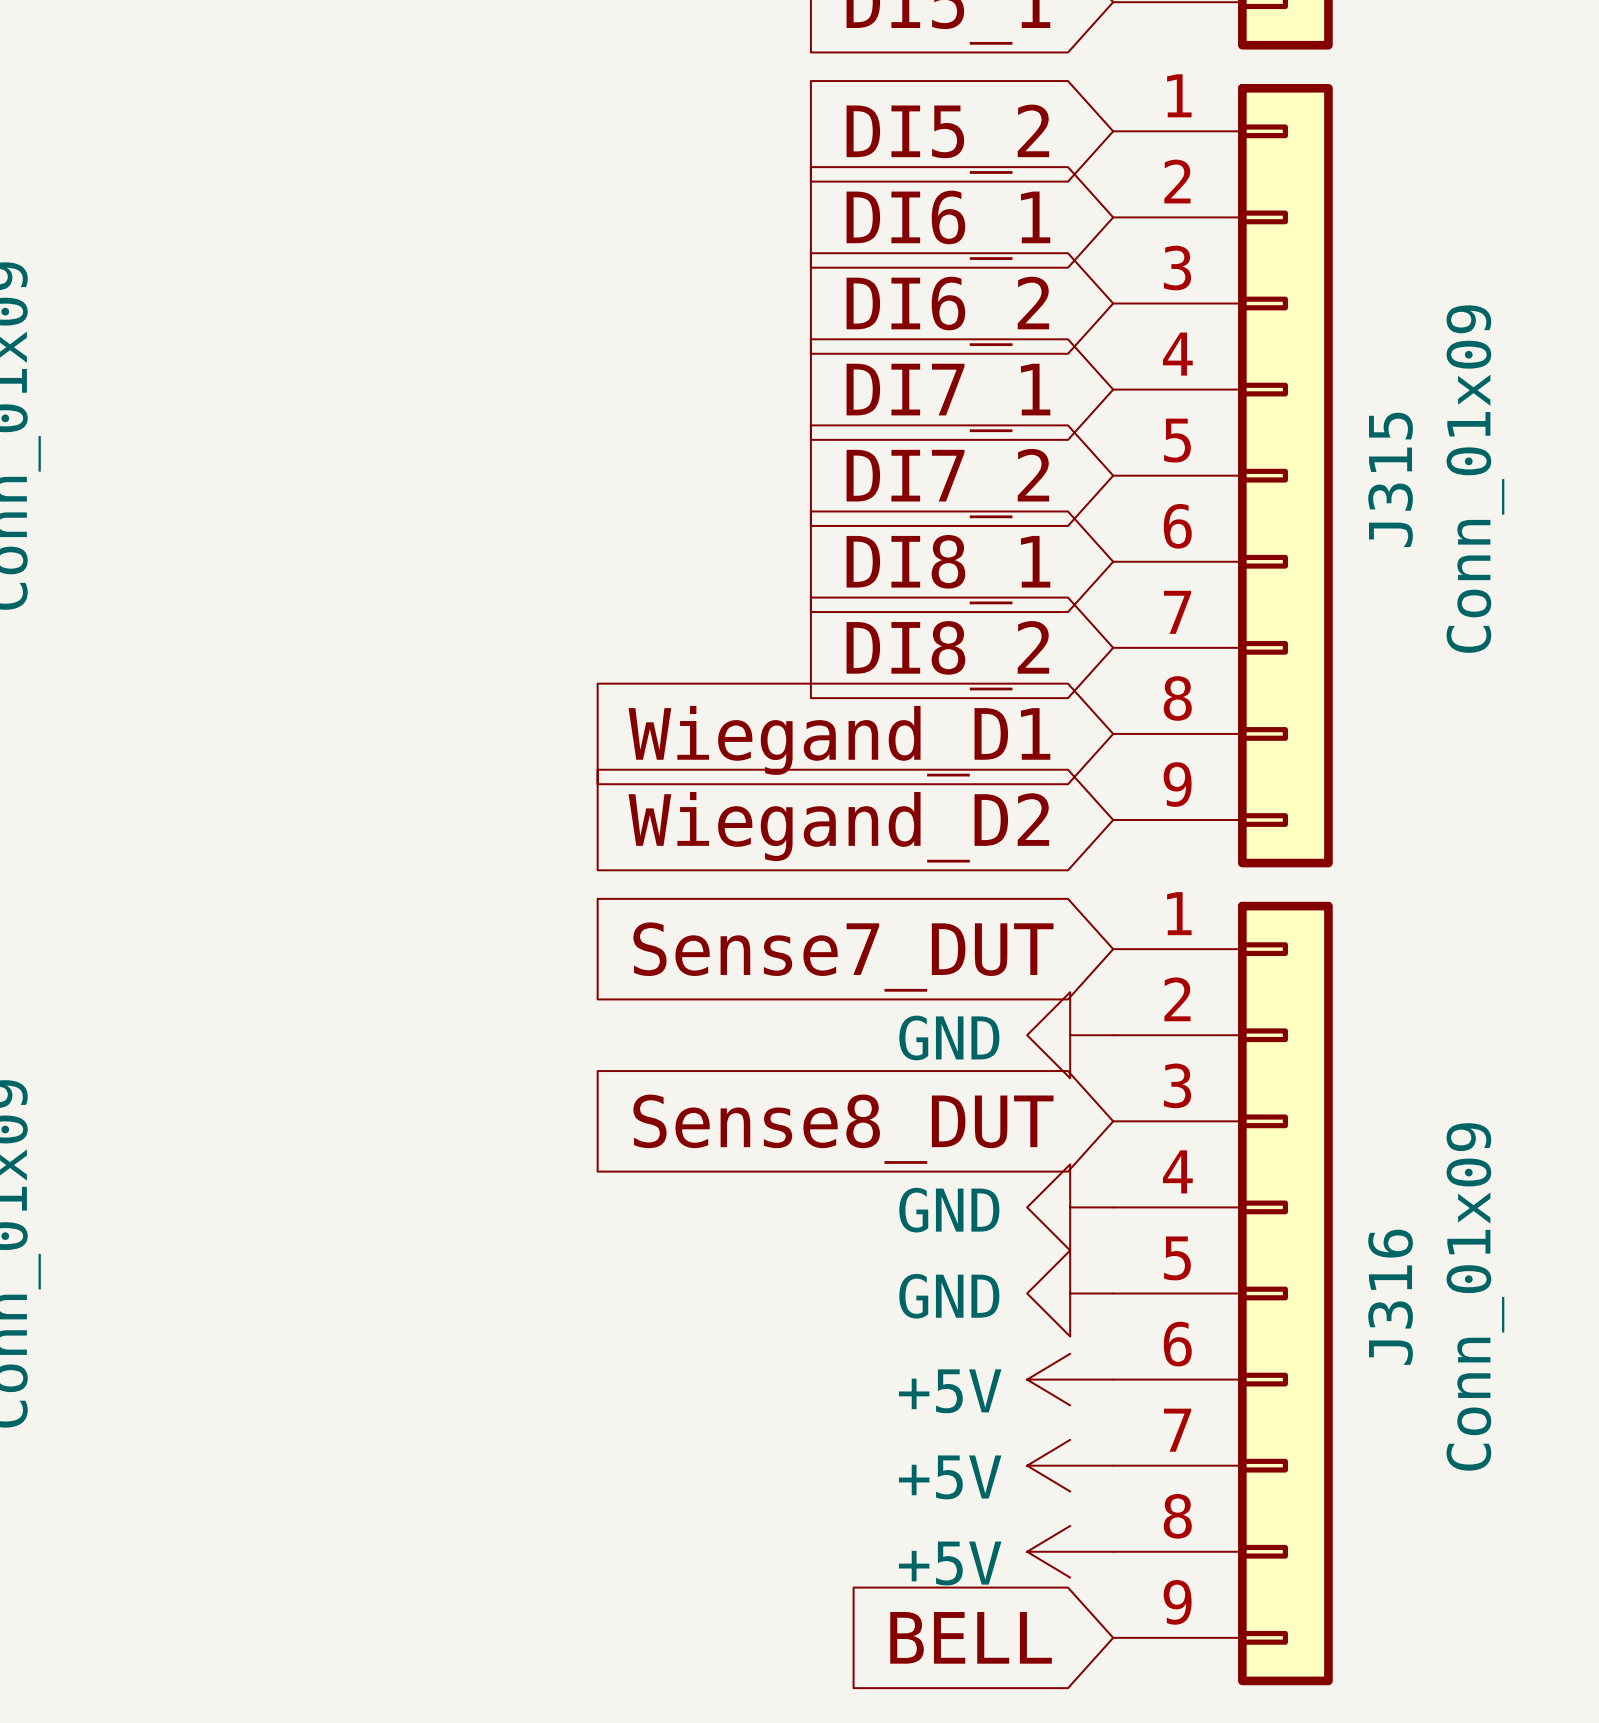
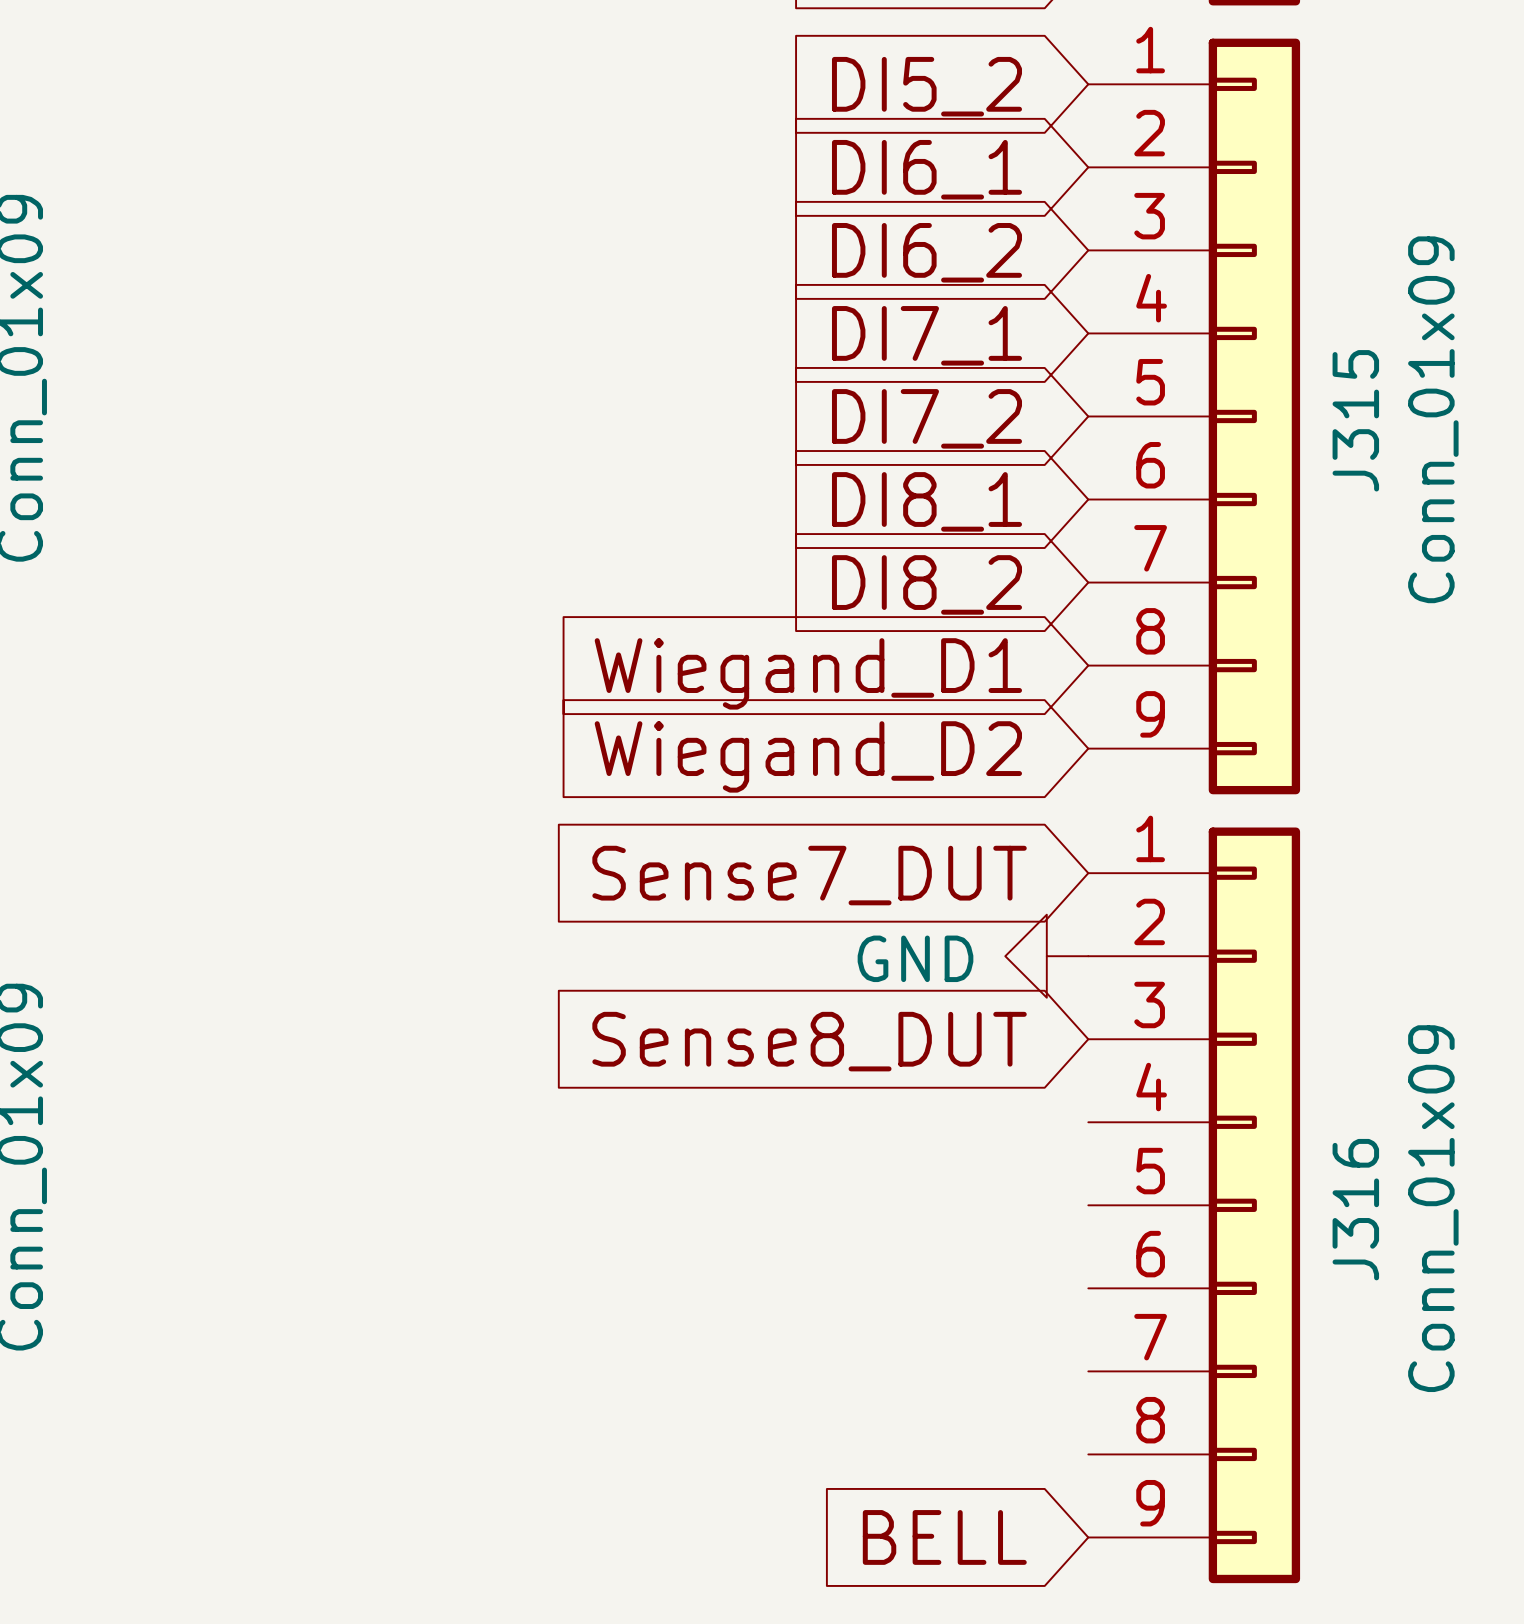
power symbol: GND (1070, 1207) -> none
power symbol: GND (1070, 1293) -> none
power symbol: +5V (1070, 1379) -> none
power symbol: +5V (1070, 1465) -> none
power symbol: +5V (1070, 1551) -> none

